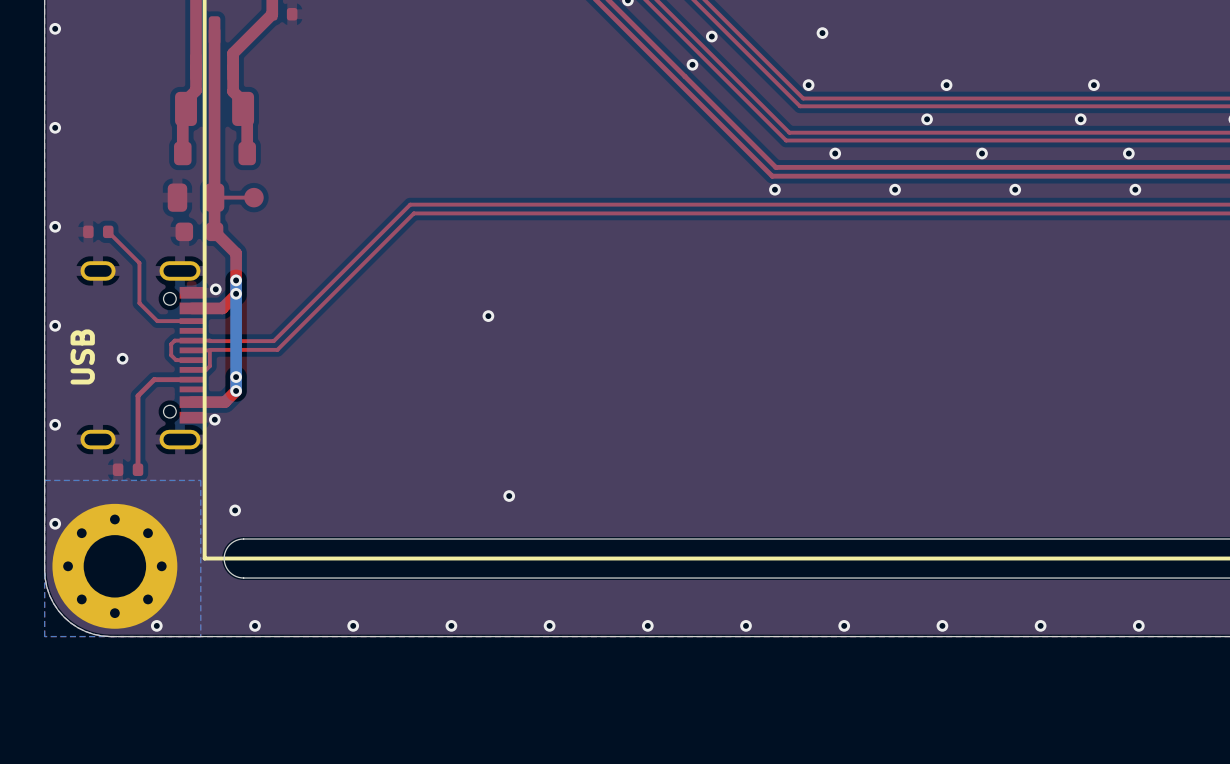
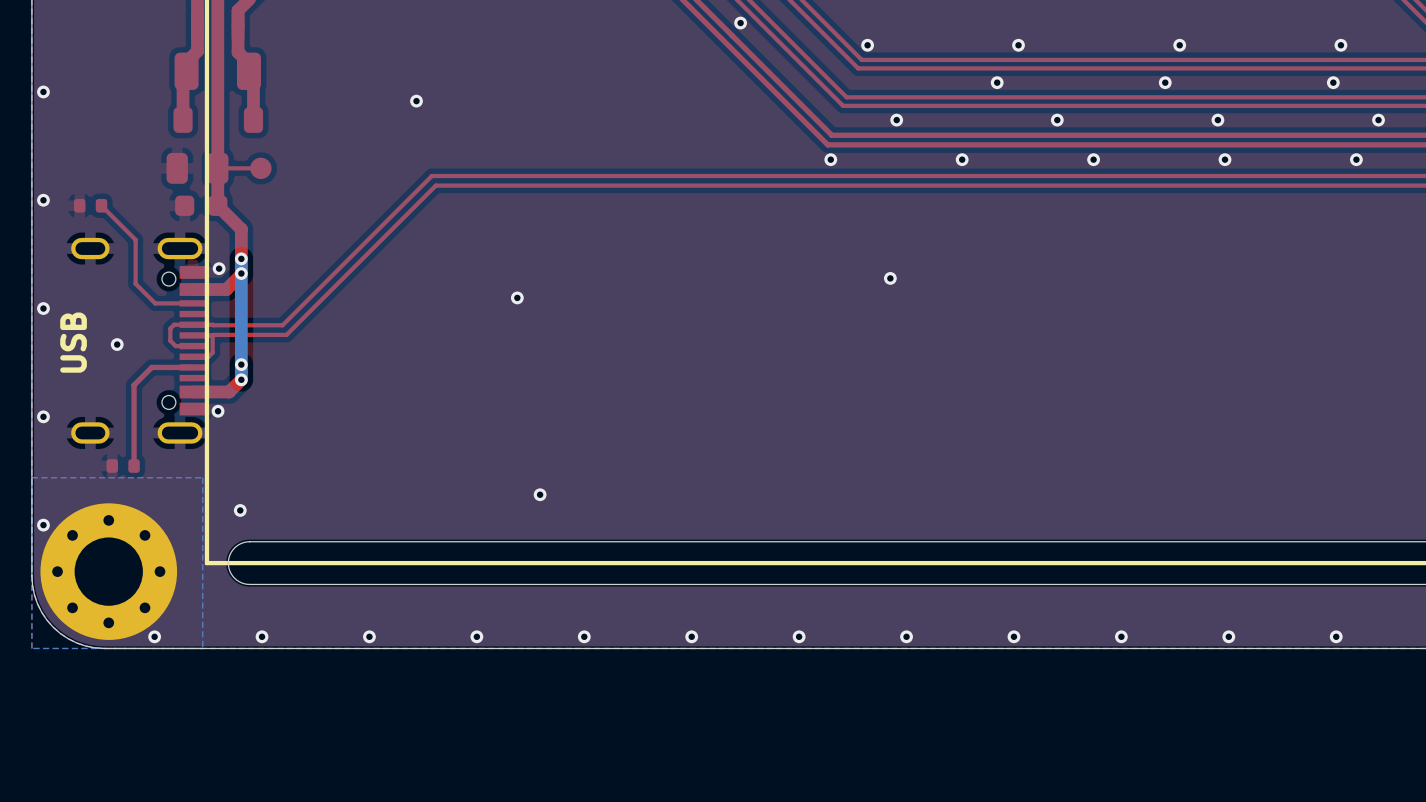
via: none -> (416, 101)
via: none -> (890, 278)

